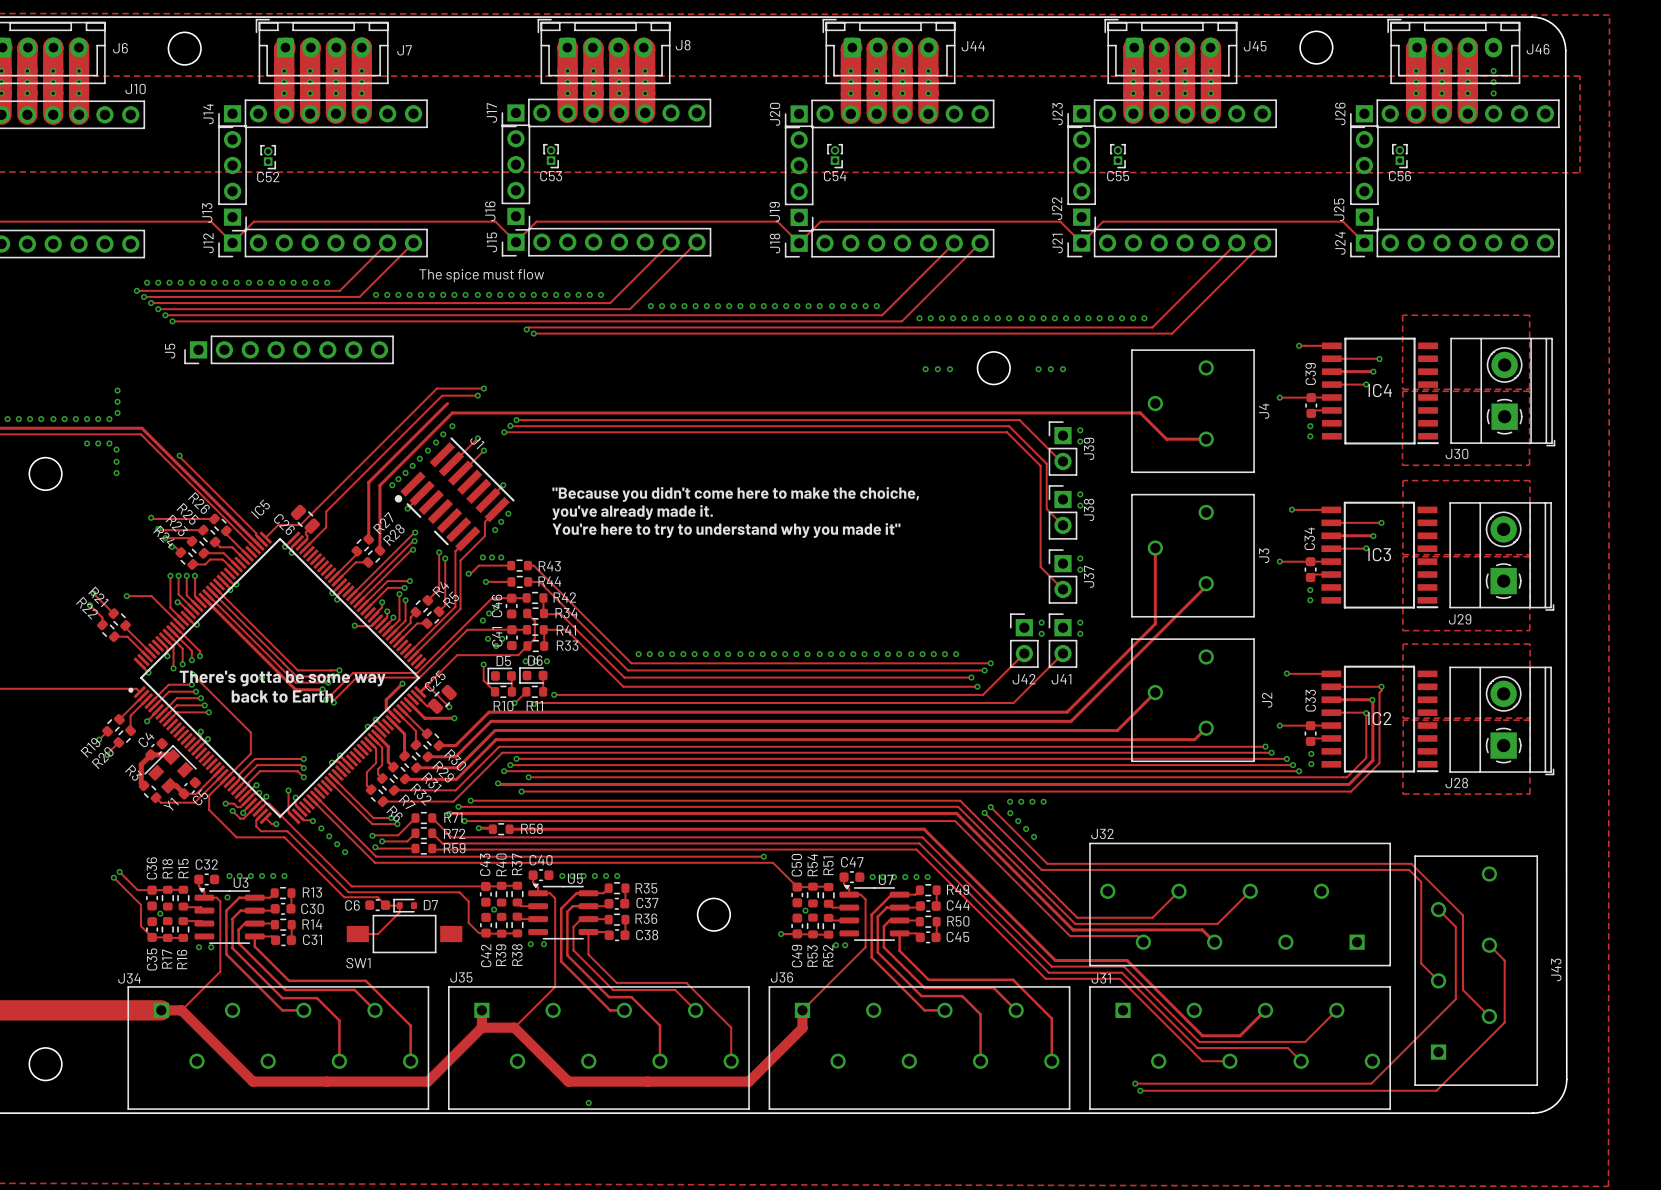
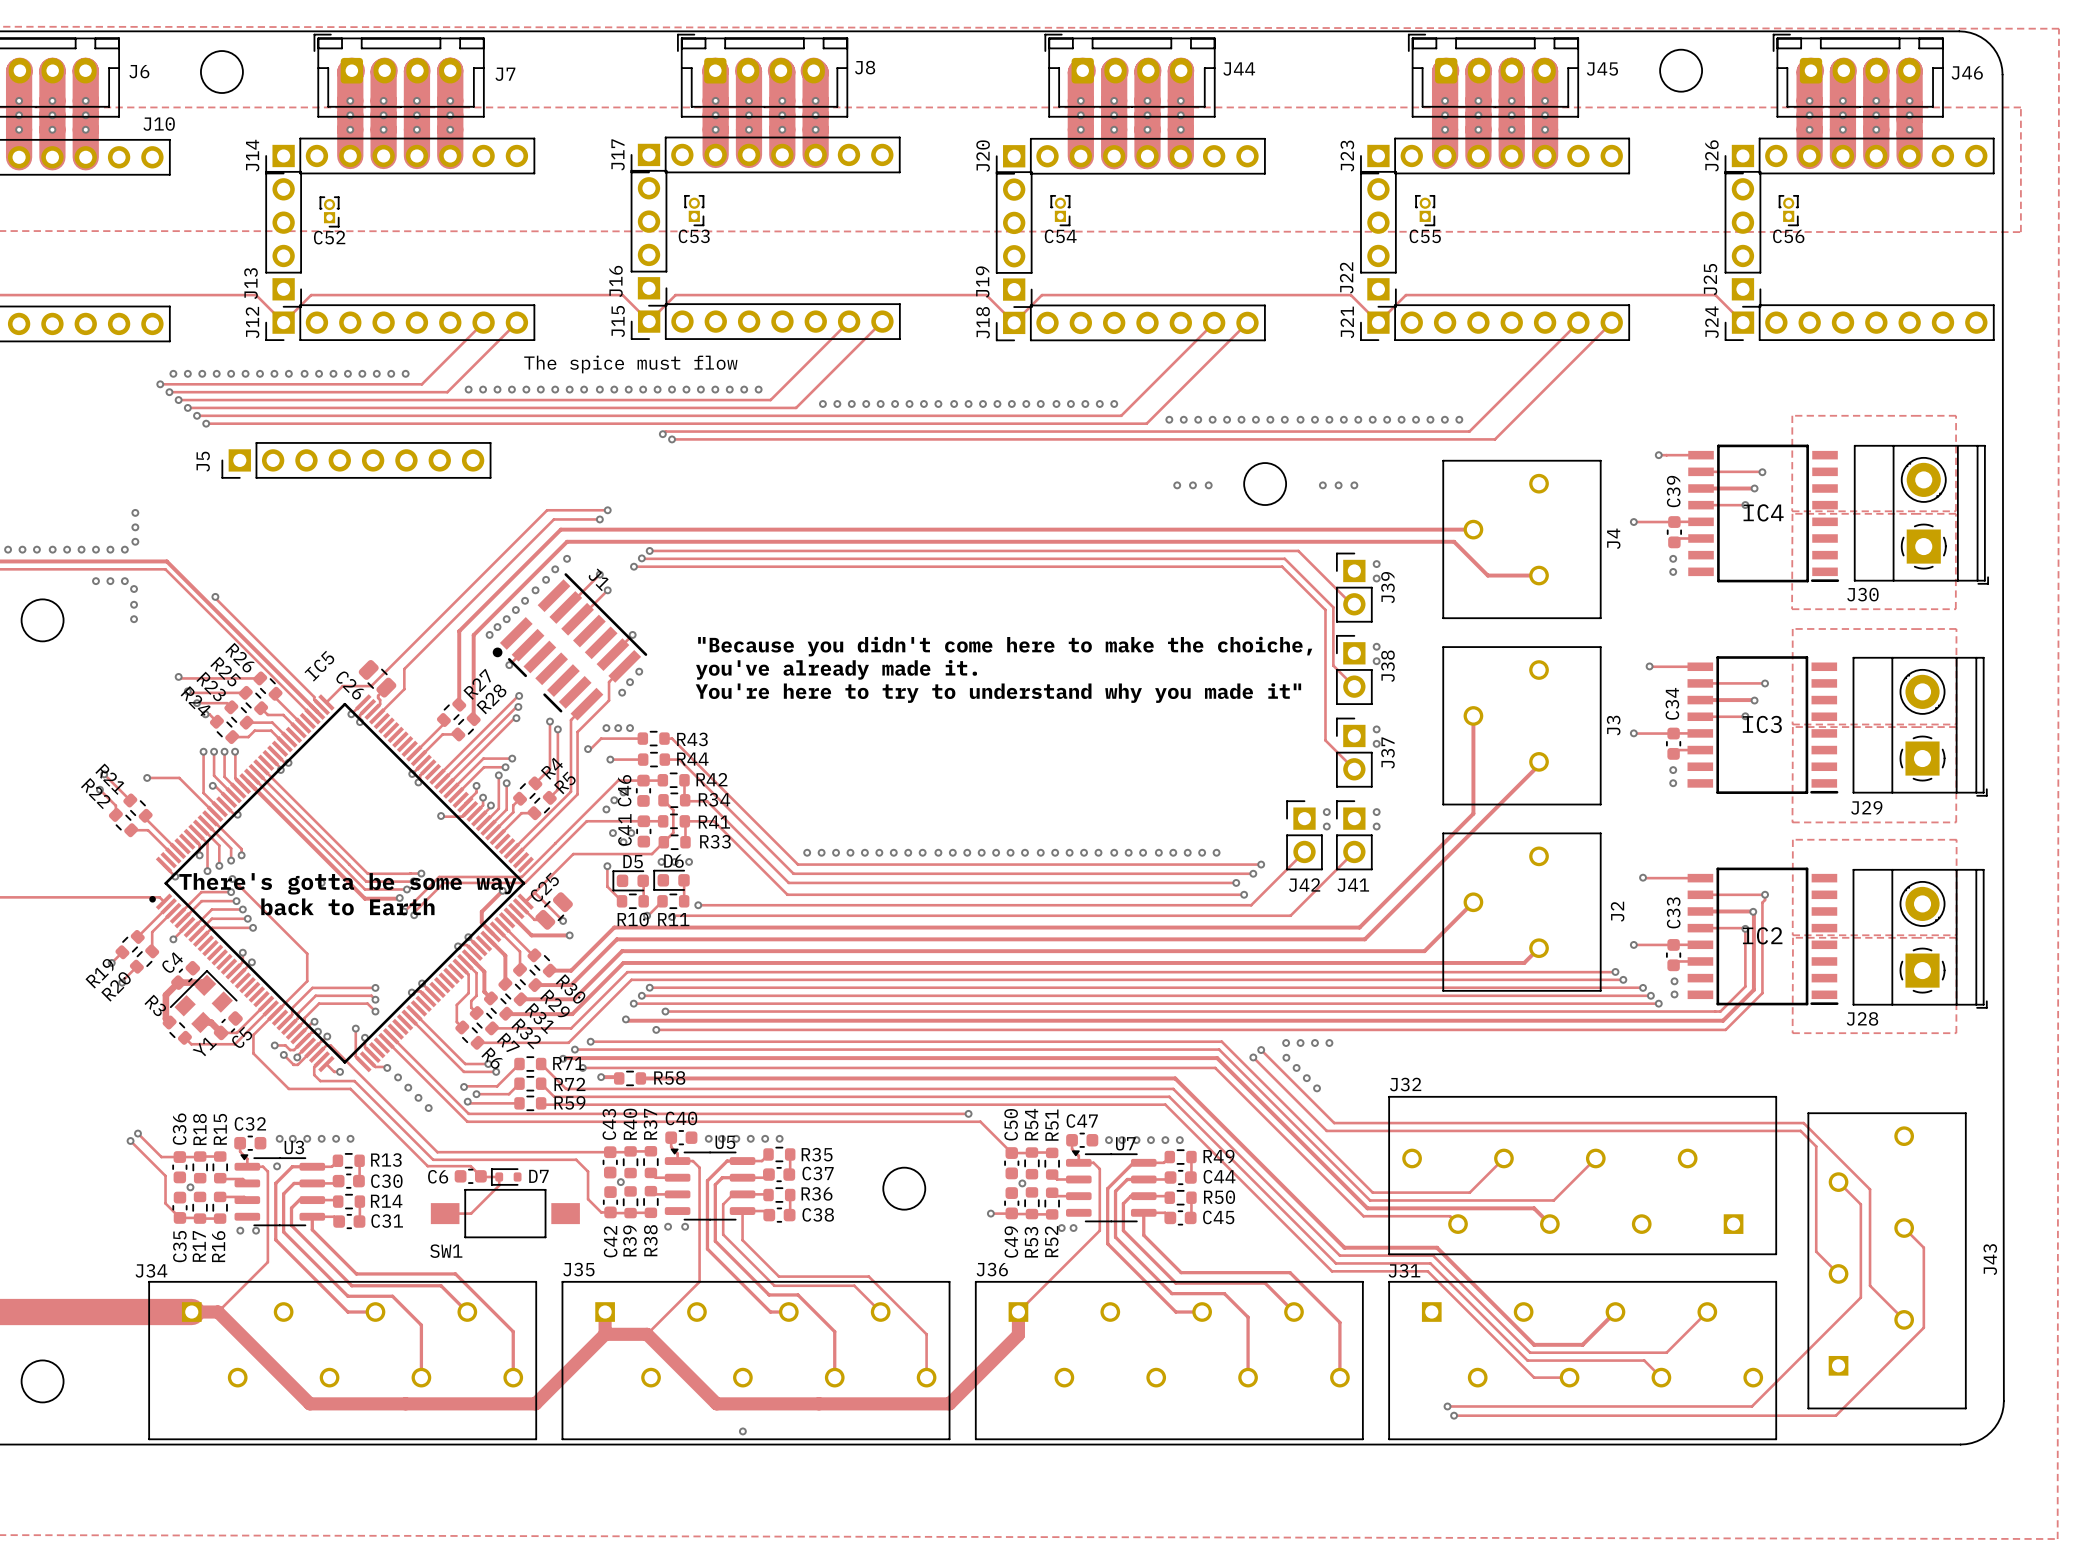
track: none -> (1909, 70) (1909, 155)
track: none -> (560, 529) (1473, 529)

